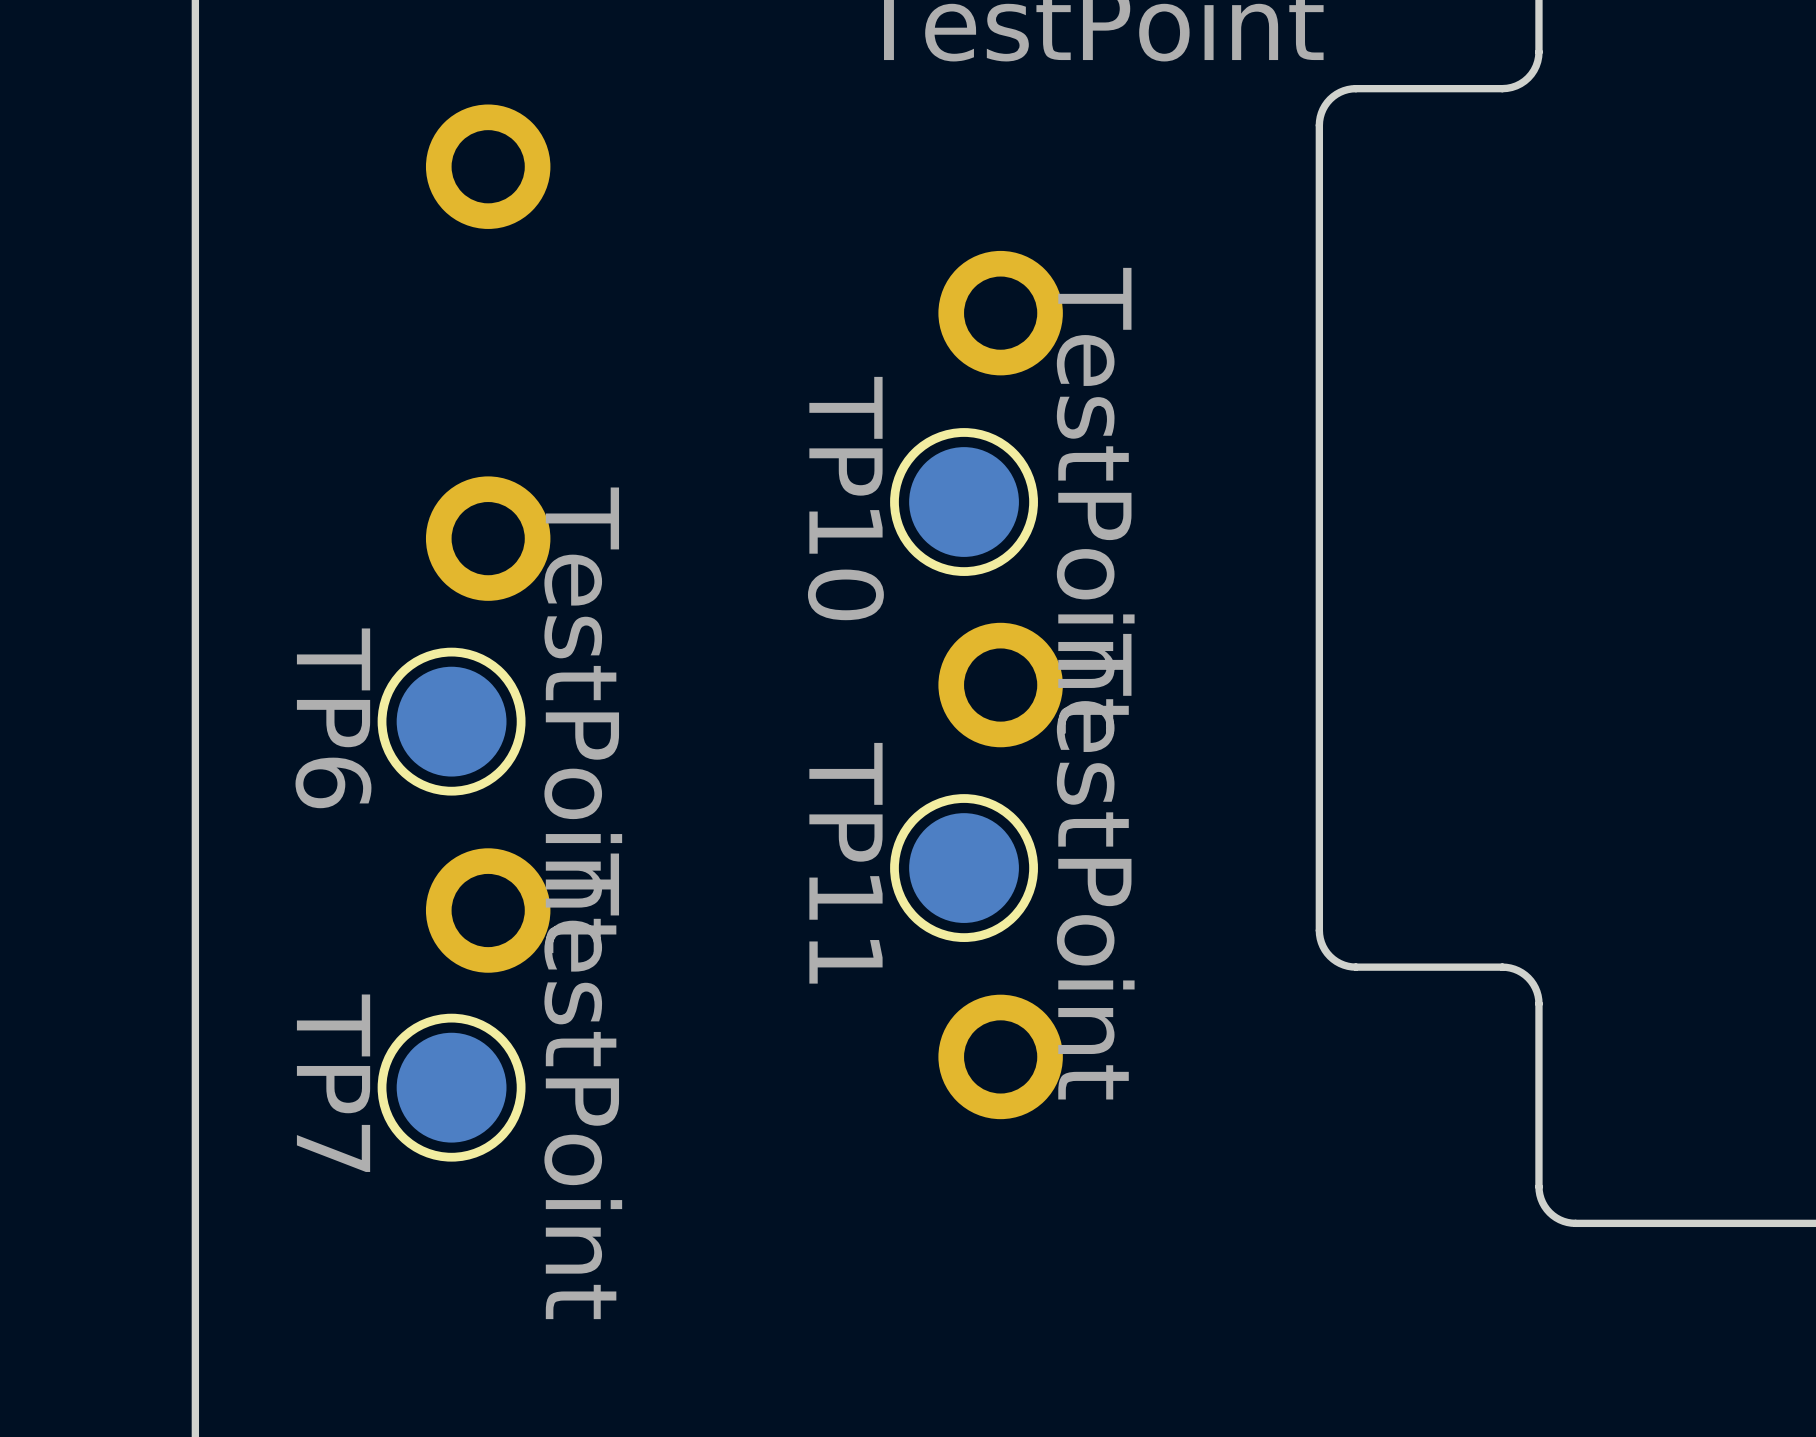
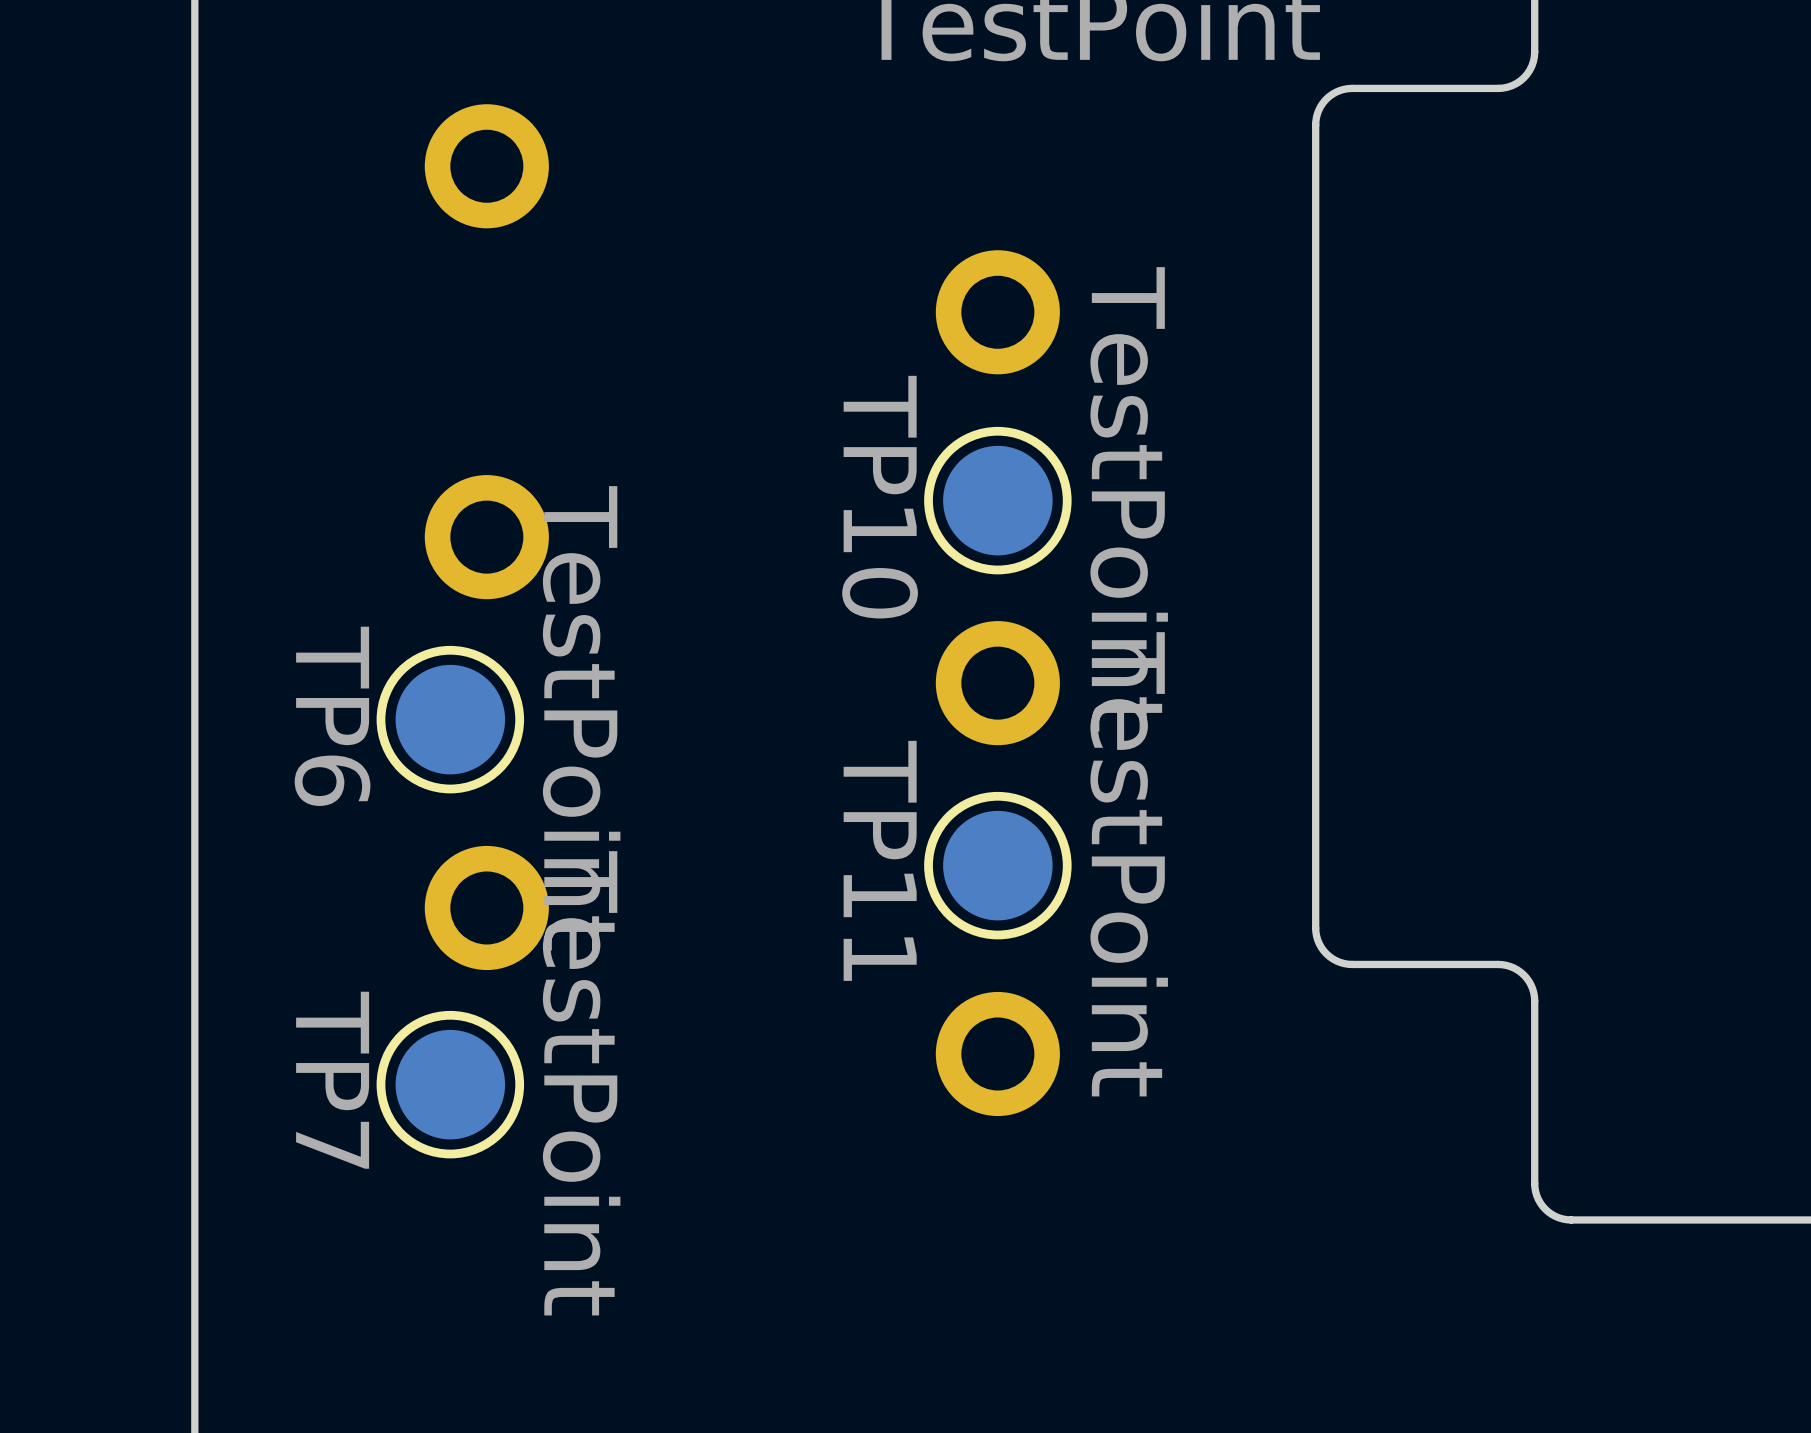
TP10 position: (964, 502) -> (997, 500)
TP11 position: (964, 868) -> (997, 865)

